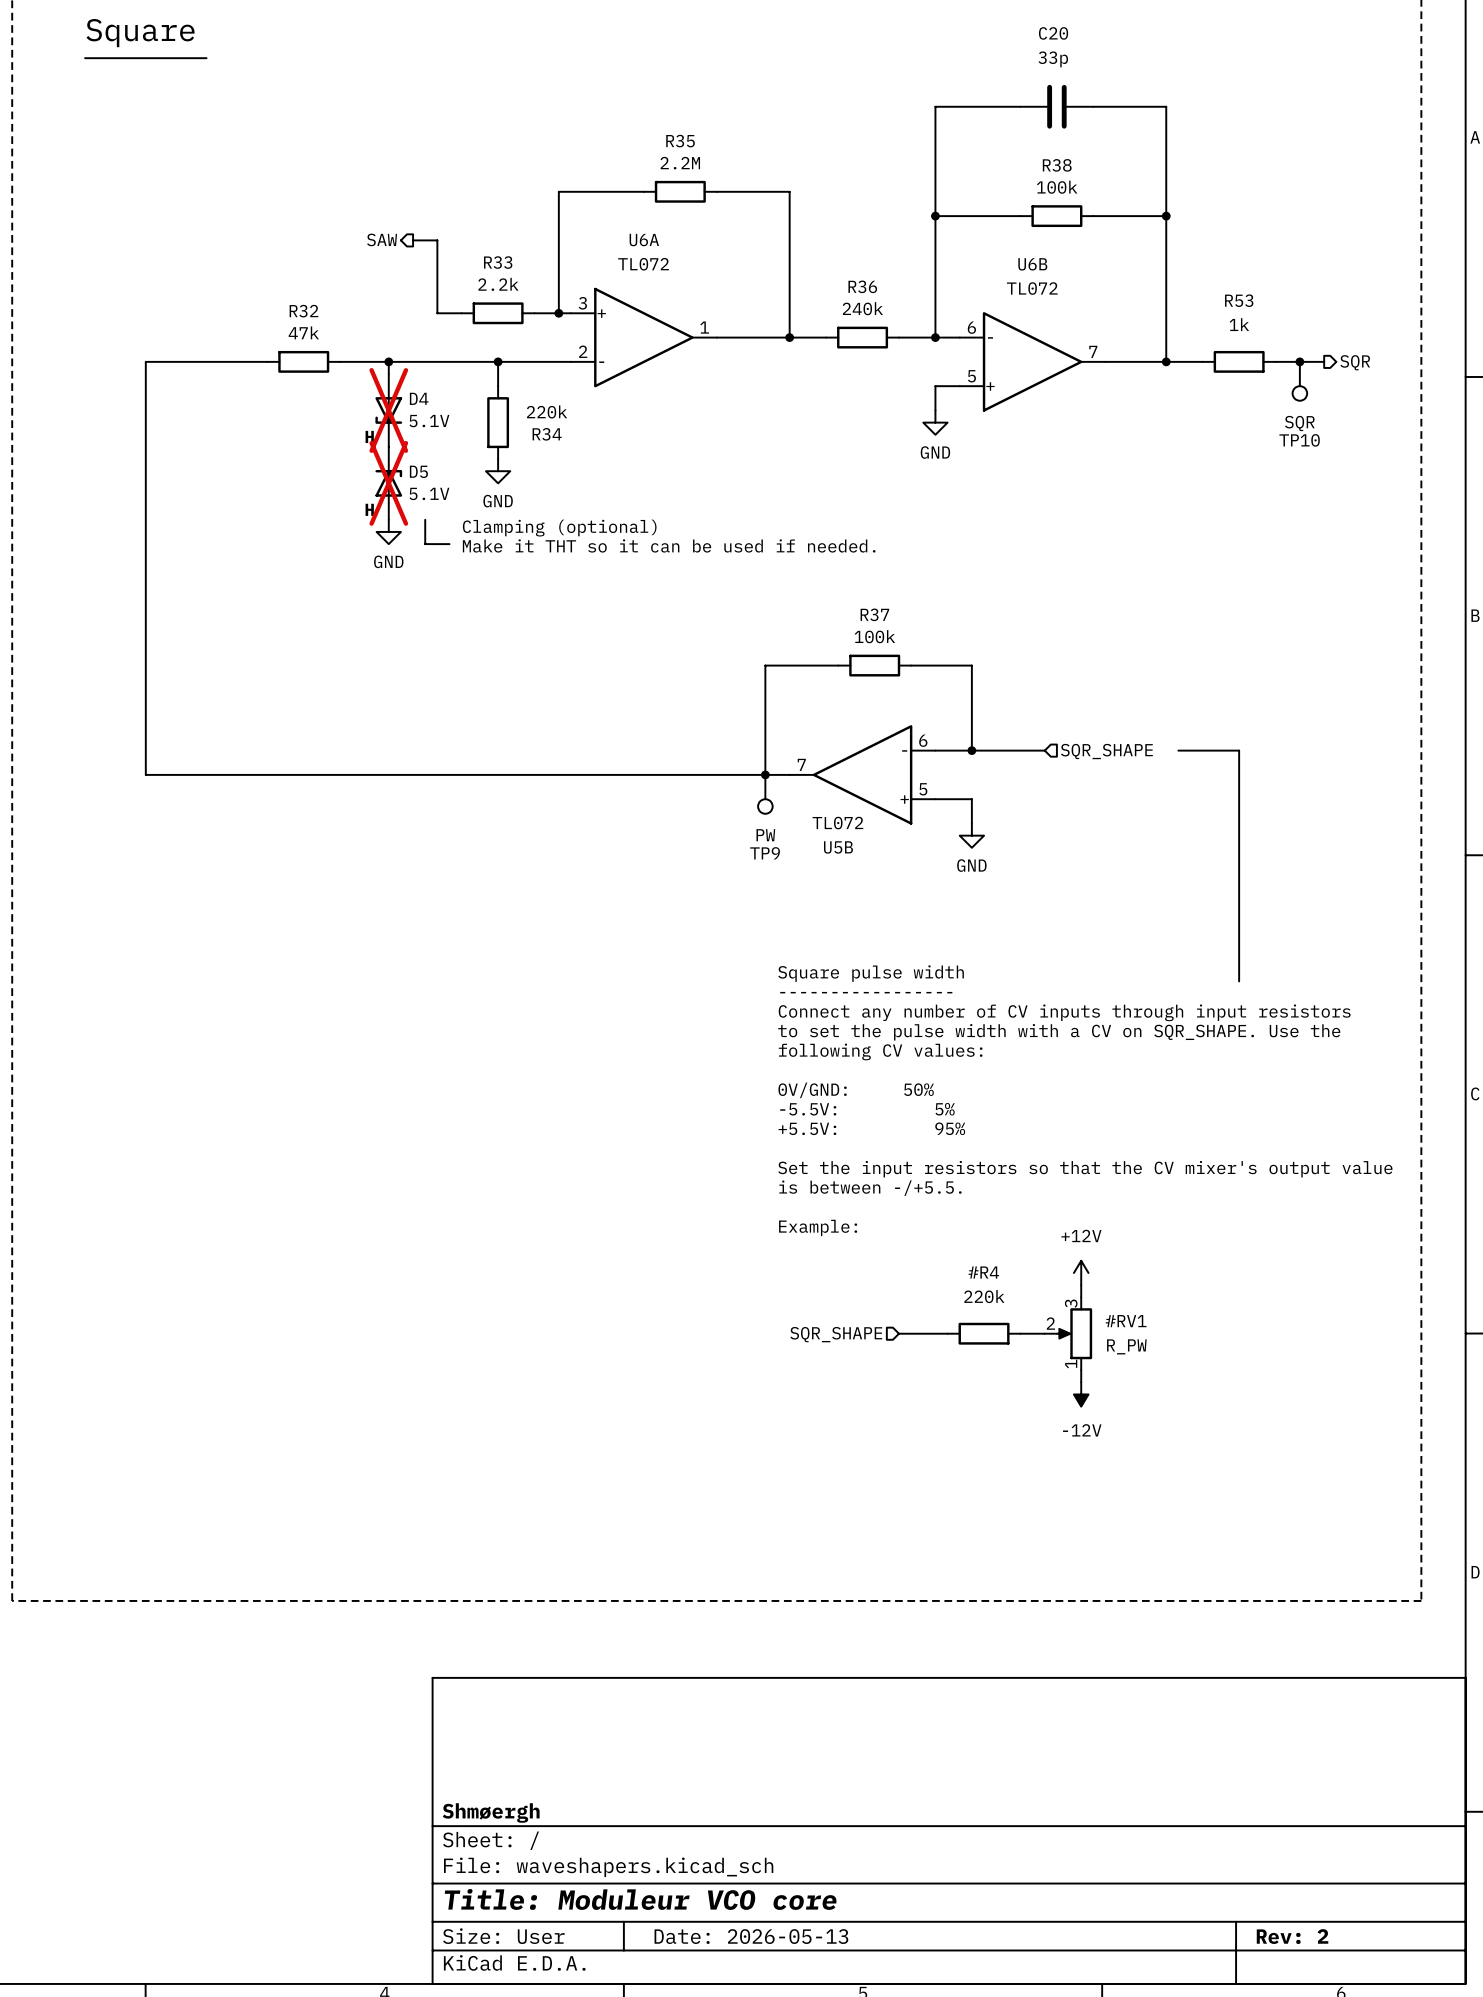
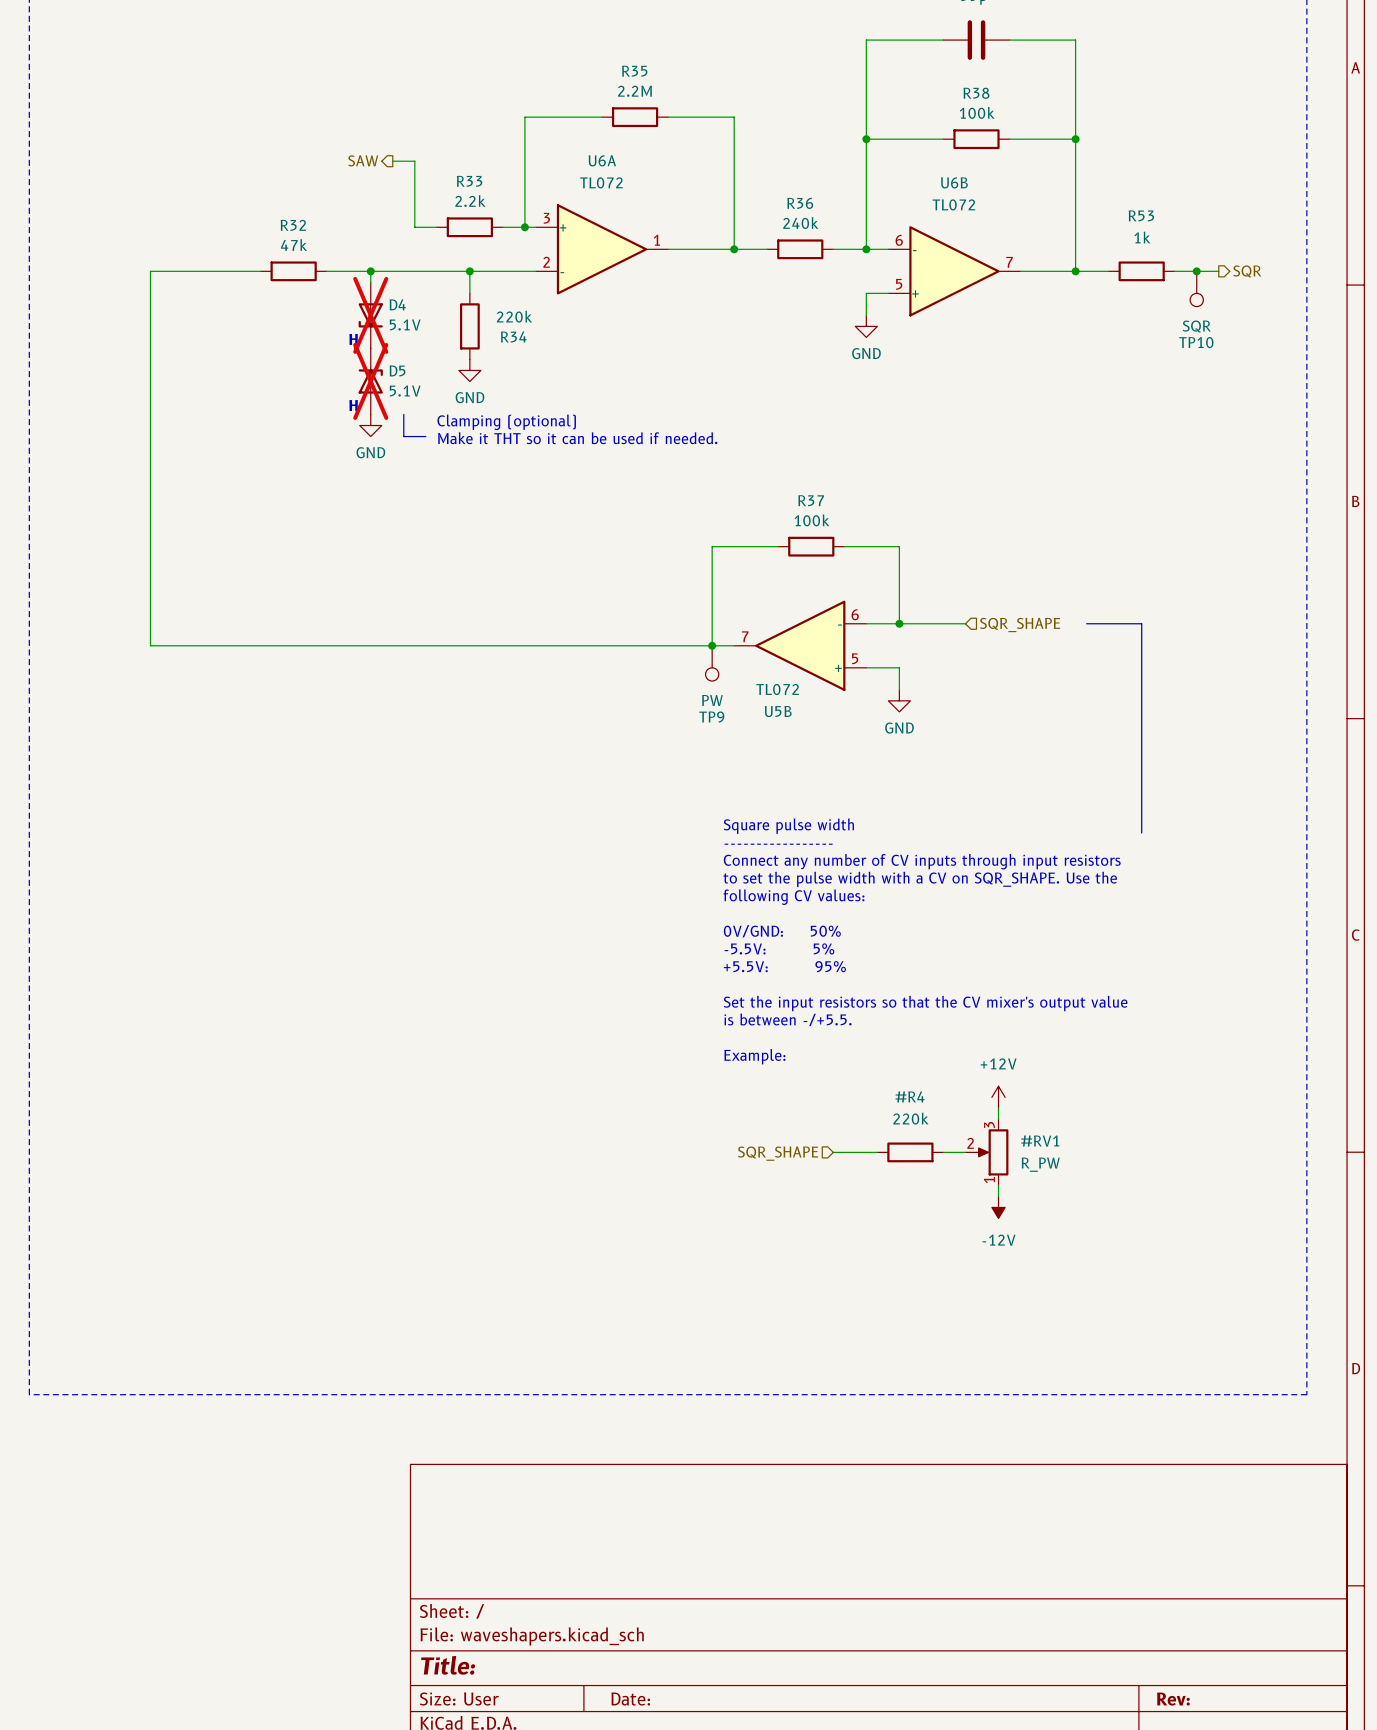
title block: Shmøergh (491, 1813) -> none
title block: Title: Moduleur VCO core (640, 1899) -> Title: (448, 1665)
title block: Date: 2026-05-13 (751, 1936) -> Date: (630, 1699)
title block: Rev: 2 (1292, 1936) -> Rev: (1173, 1699)

